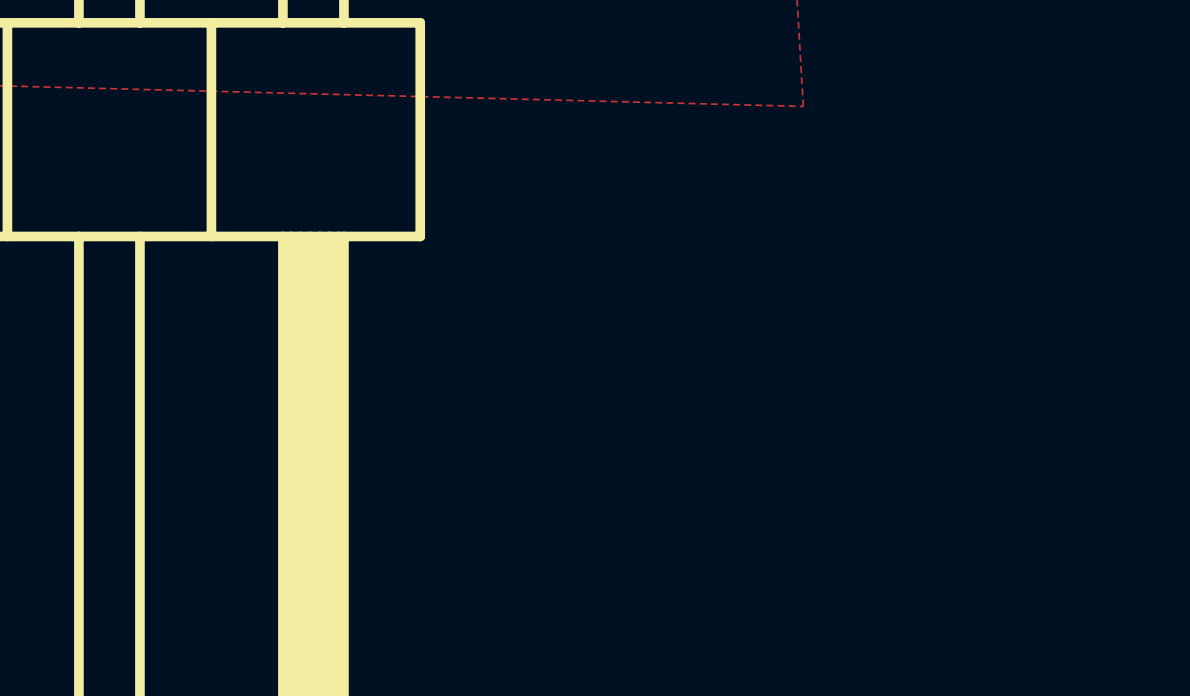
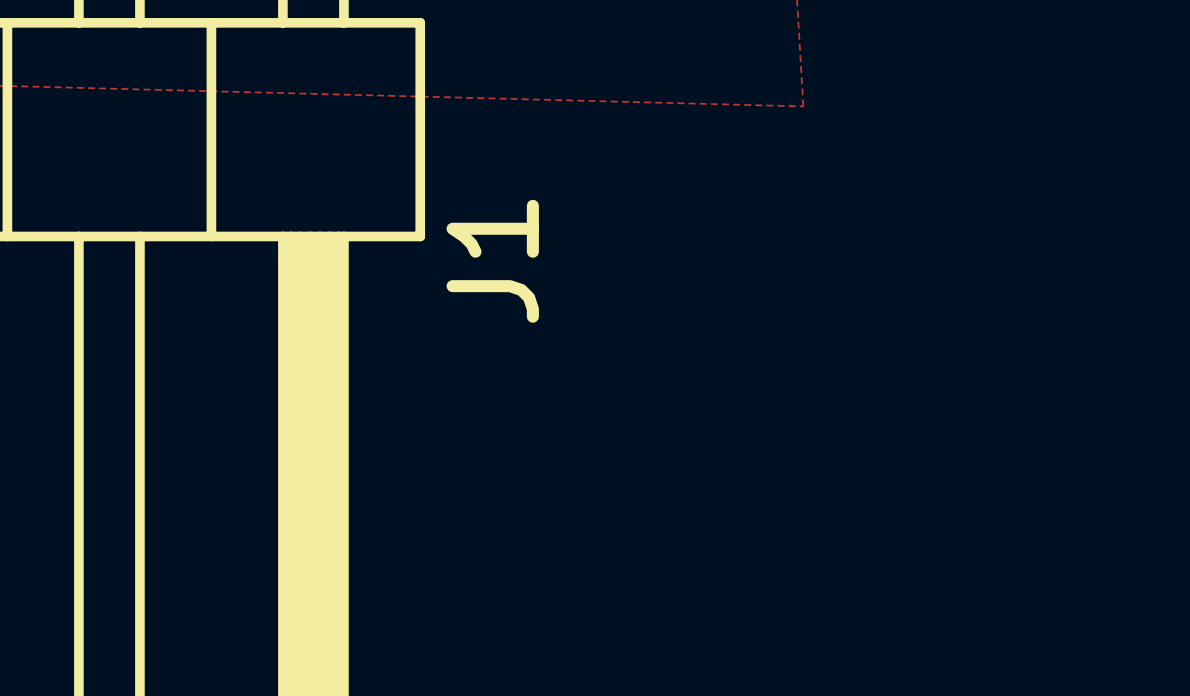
J1 name: none -> J1 (492, 261)

